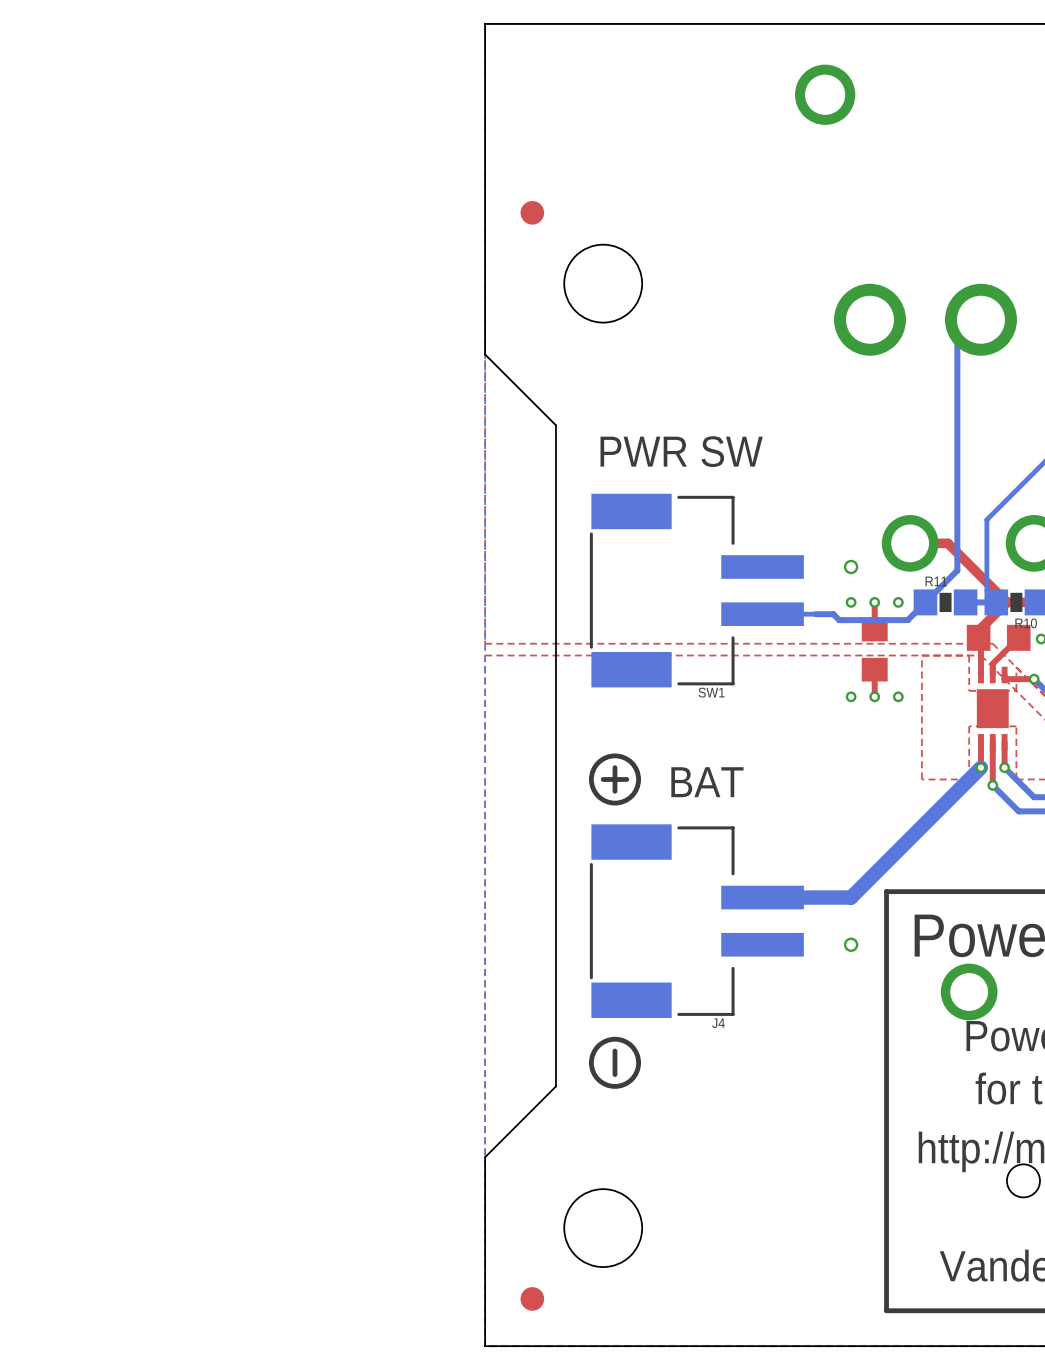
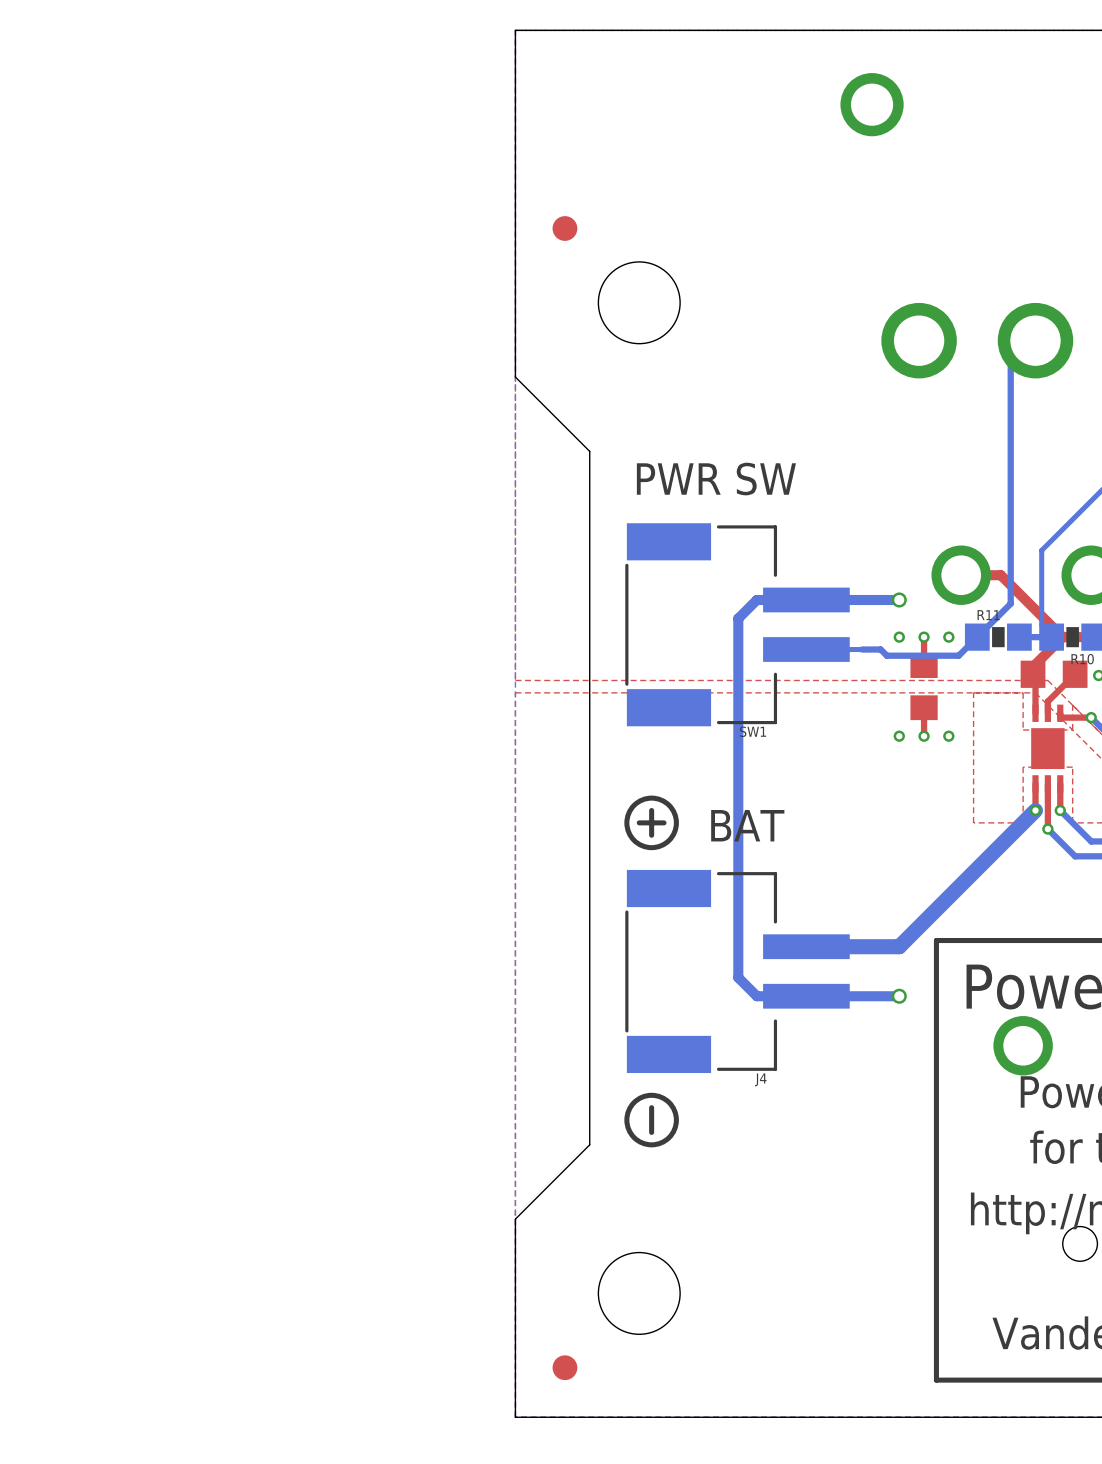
bottom track: none -> (899, 599) (756, 599) (738, 618) (738, 977) (756, 996) (806, 996)
bottom track: none -> (899, 996) (812, 996)

